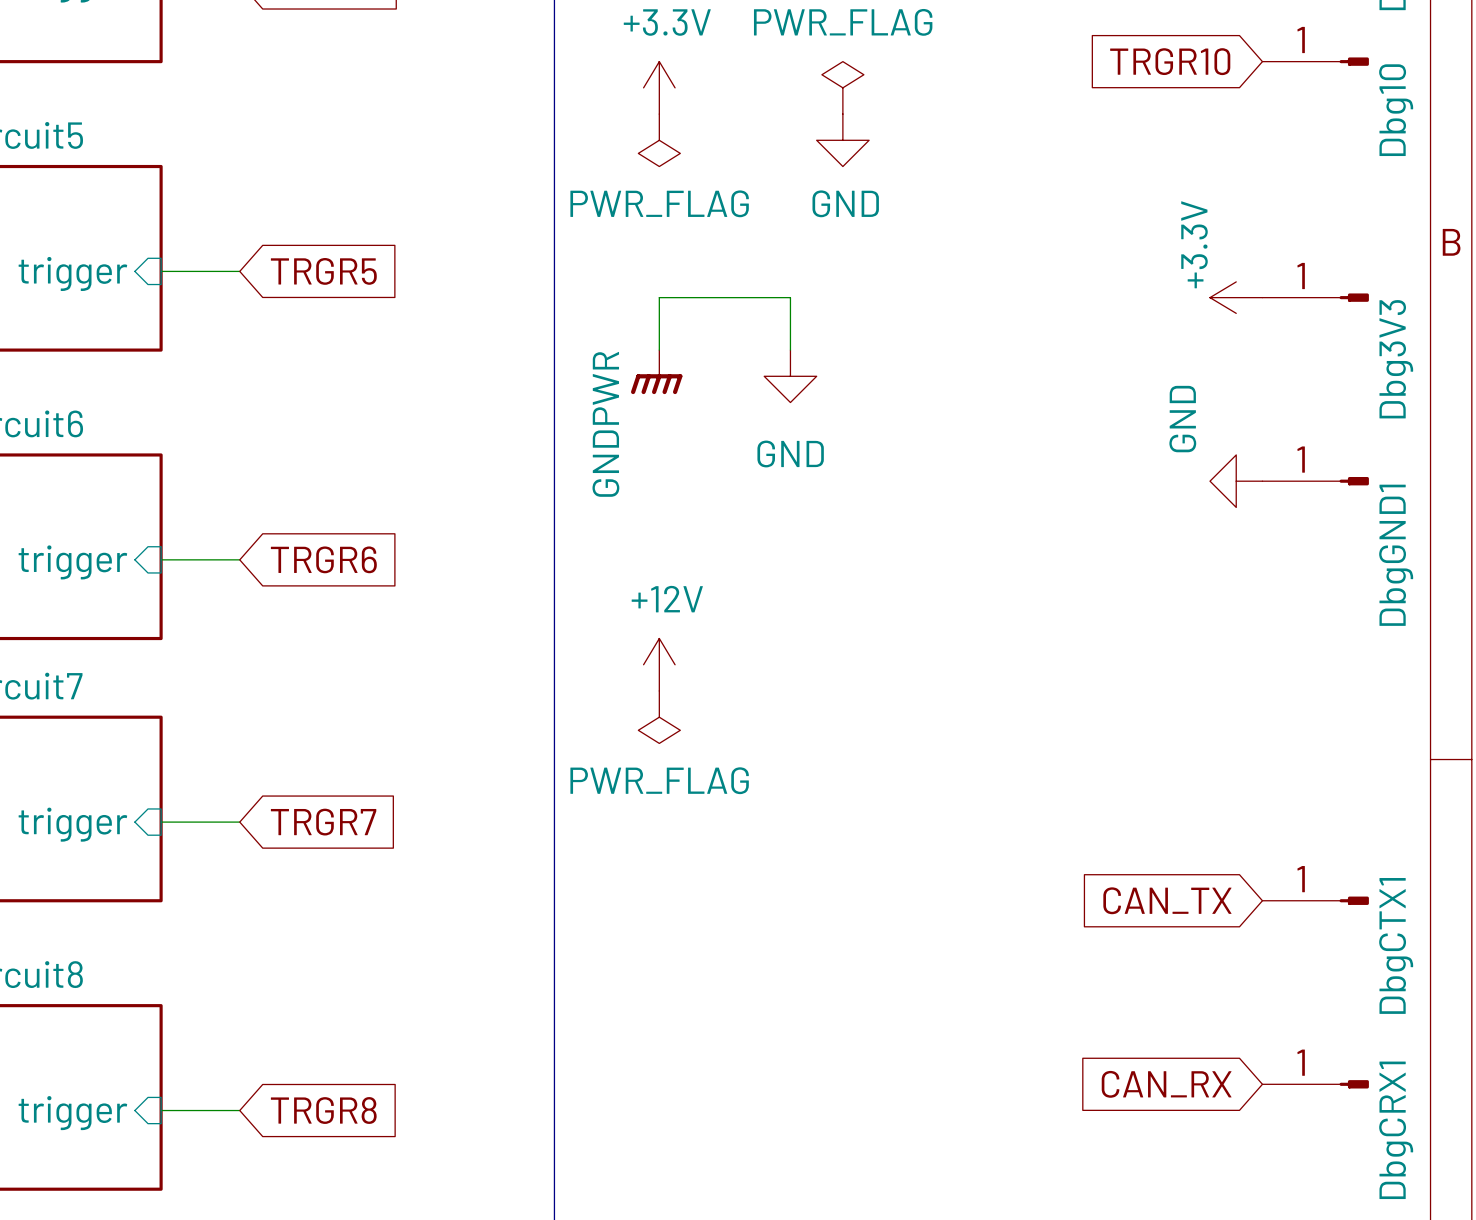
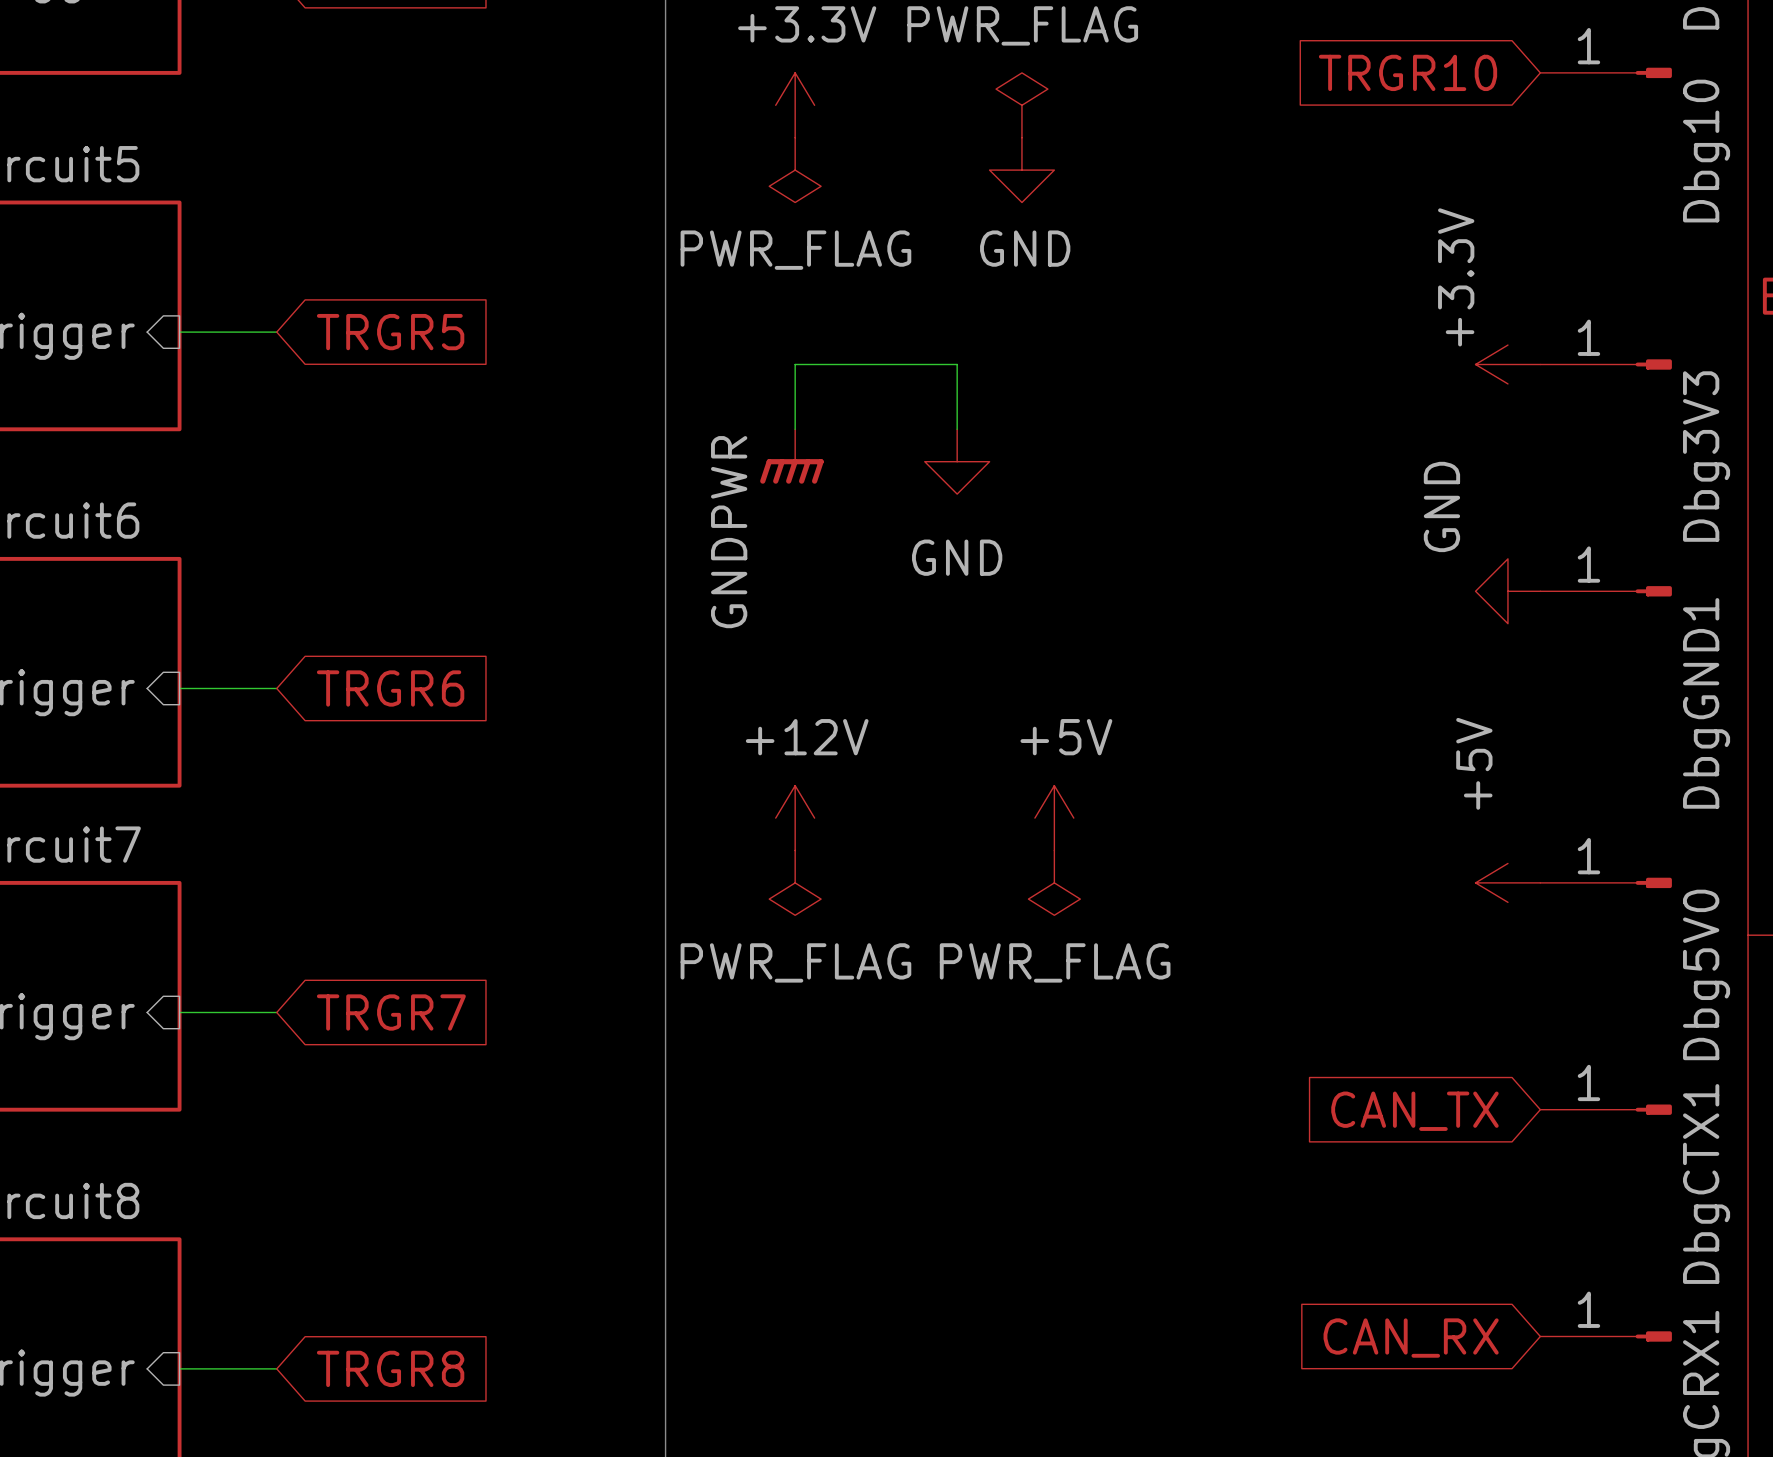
power symbol: none -> +5V (1054, 818)
power symbol: none -> PWR_FLAG (1054, 882)
power symbol: none -> +5V (1507, 882)
Dbg5V0: none -> (1606, 882)

